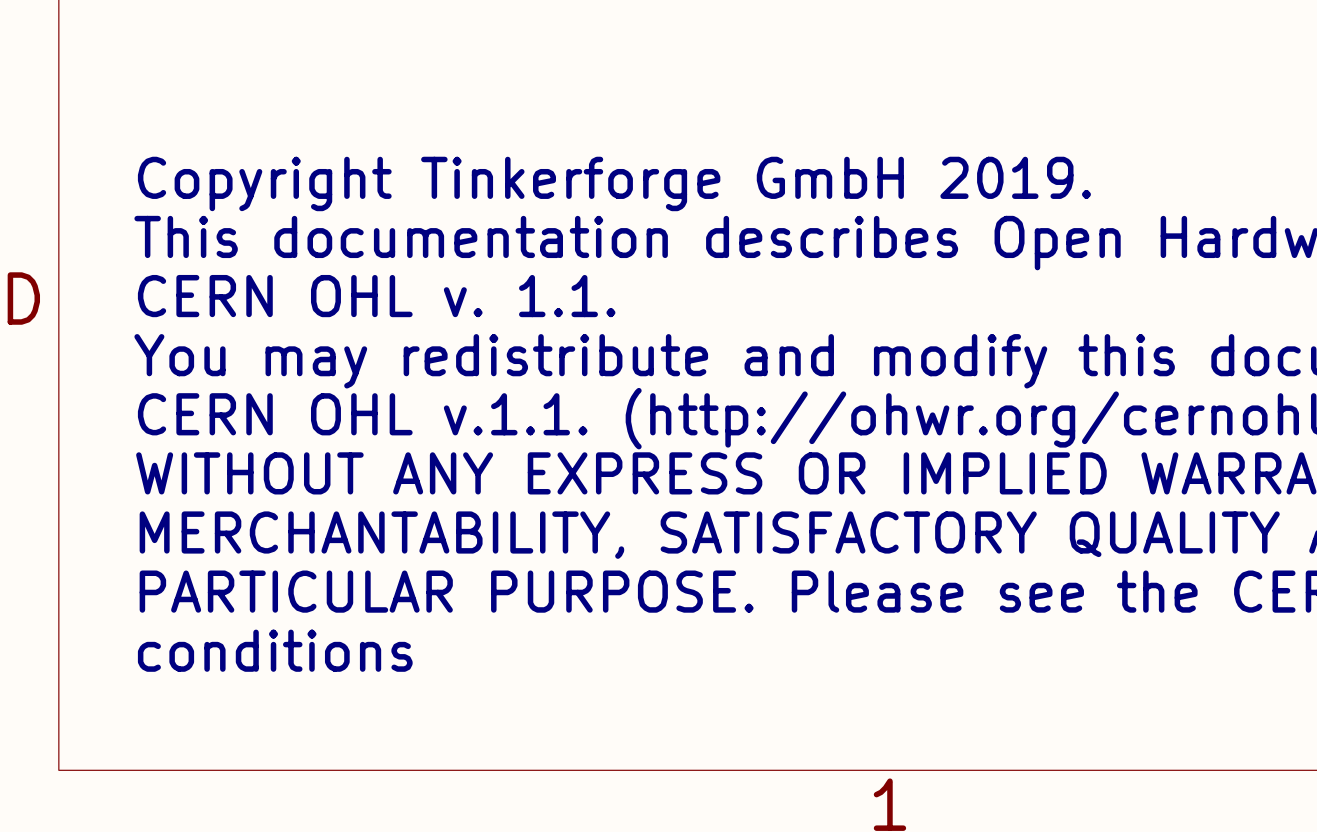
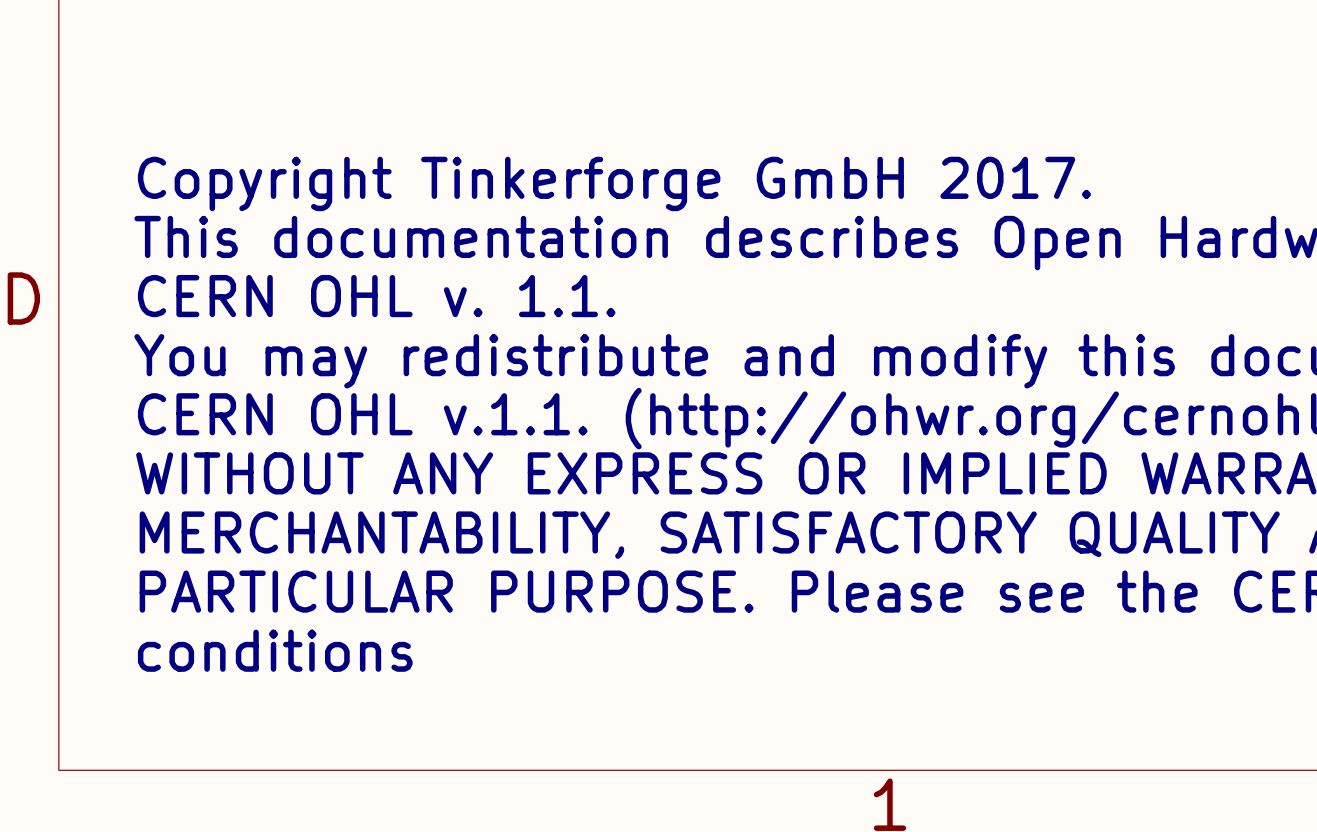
text: Copyright Tinkerforge GmbH 2019. (614, 183) -> Copyright Tinkerforge GmbH 2017. (614, 183)

